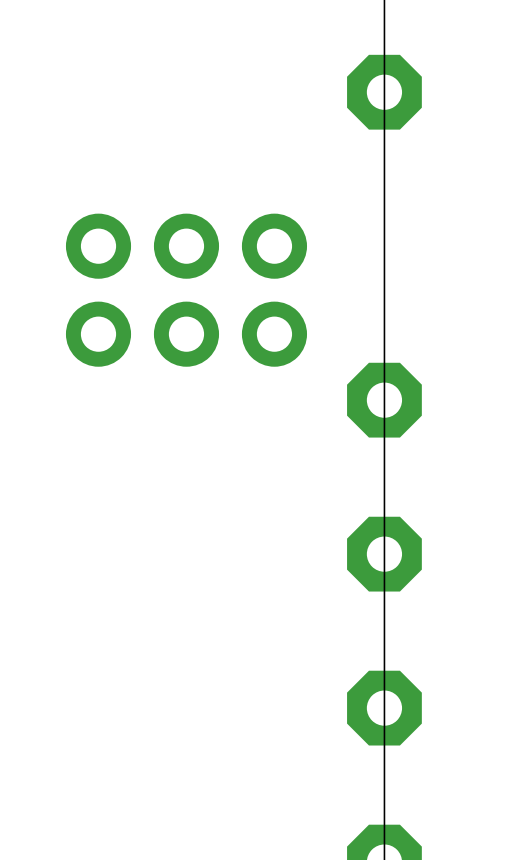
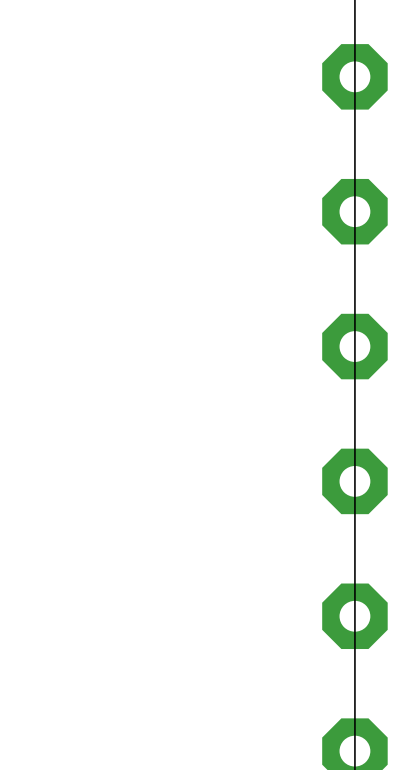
part: none -> (354, 211)
part: (186, 290) -> none

